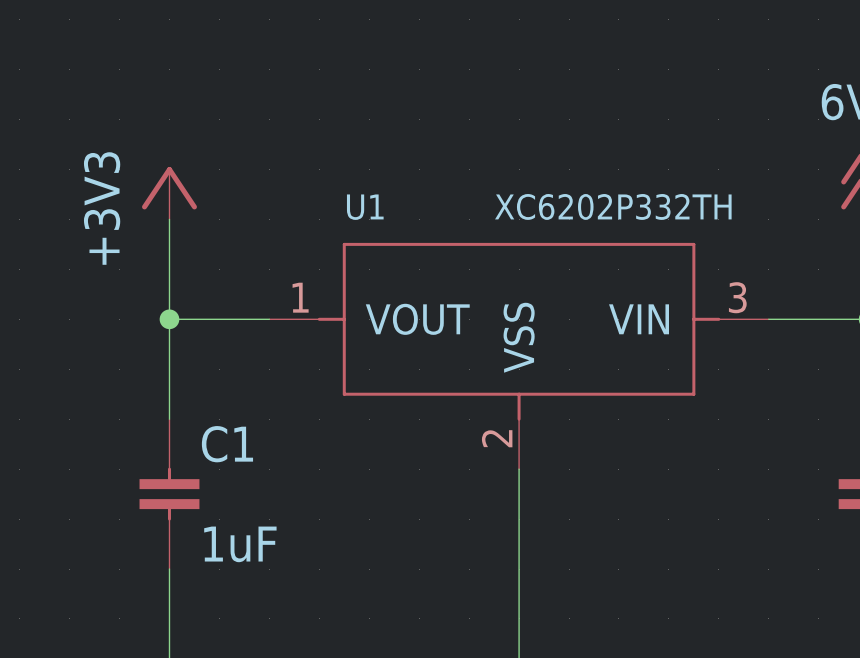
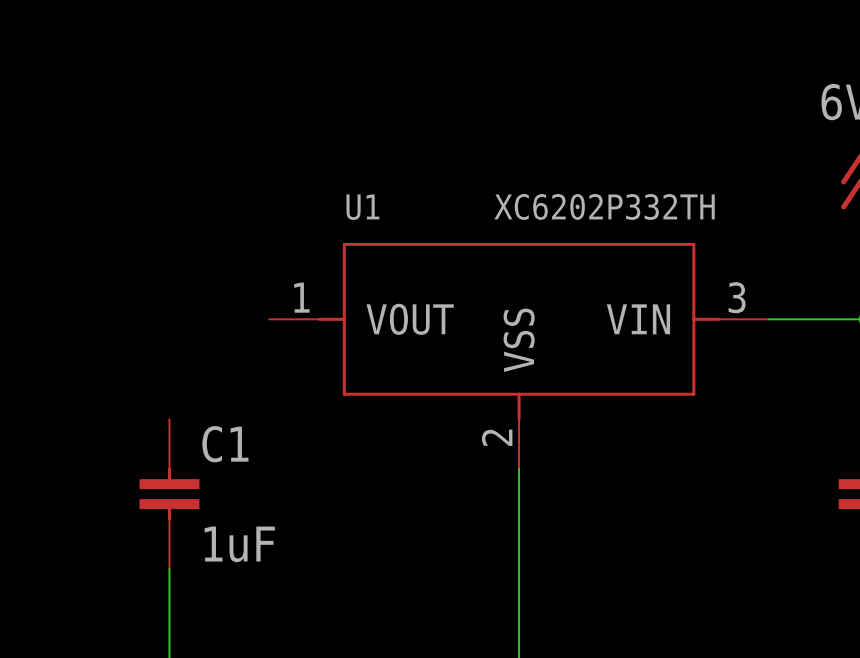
power symbol: +3V3 (169, 193) -> none
wire: (169, 219) (169, 419) -> none
wire: (169, 319) (269, 319) -> none
junction: (169, 319) -> none

